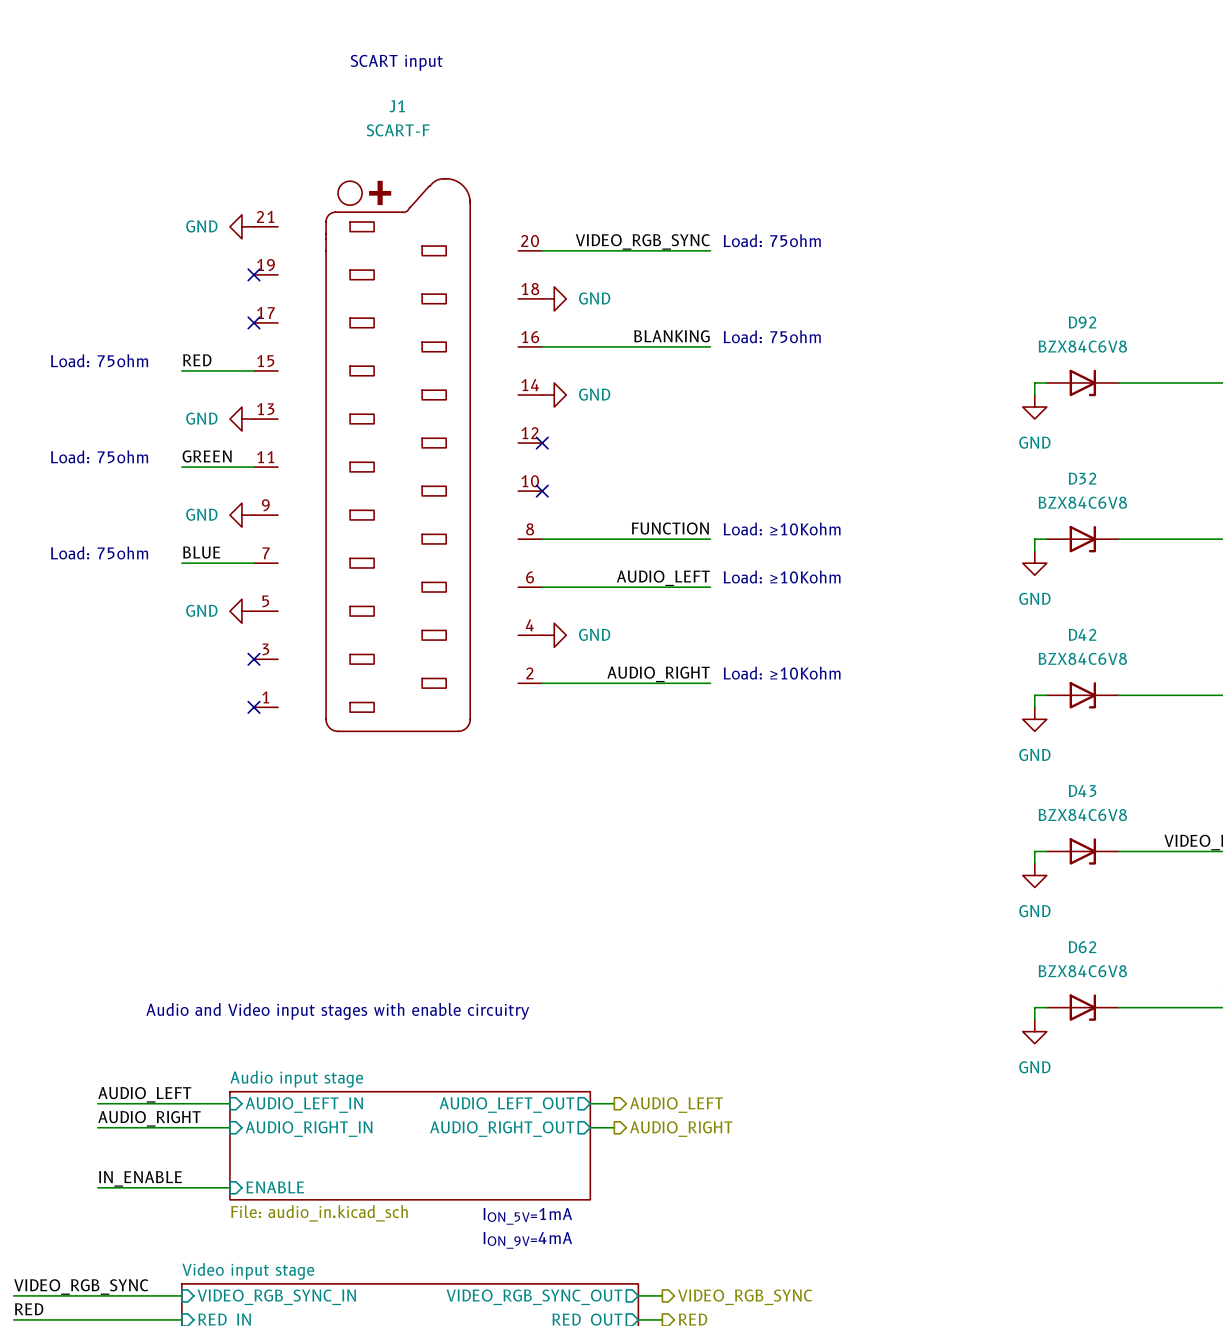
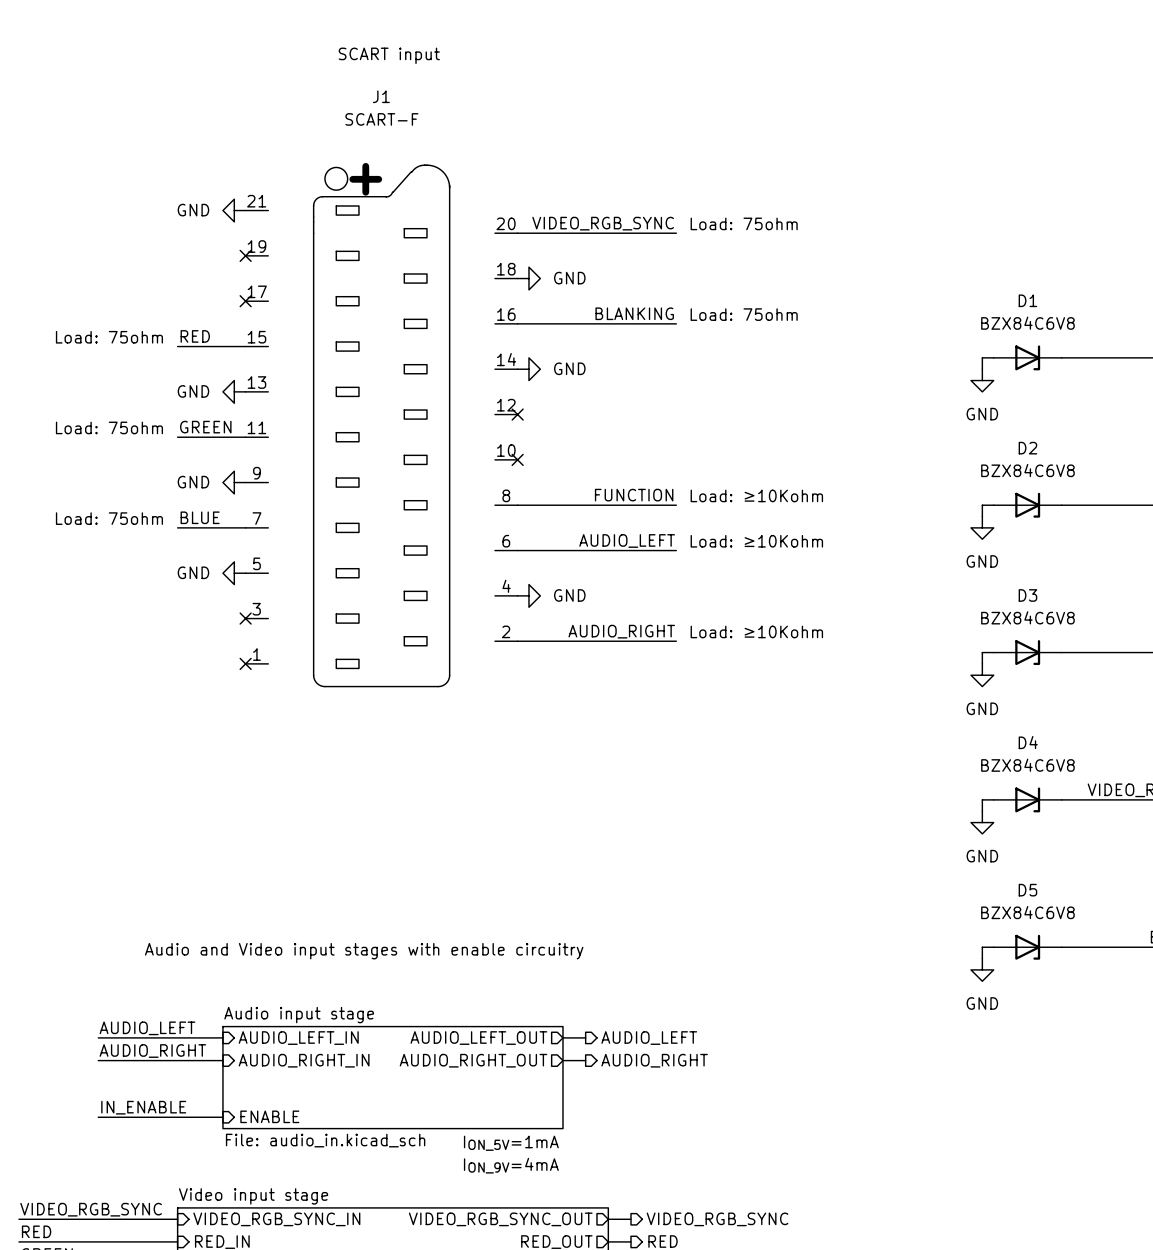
D92 name: D92 (1082, 322) -> D1 (1027, 300)
D32 name: D32 (1082, 478) -> D2 (1027, 448)
D42 name: D42 (1082, 634) -> D3 (1027, 595)
D43 name: D43 (1082, 790) -> D4 (1028, 742)
D62 name: D62 (1082, 947) -> D5 (1027, 890)

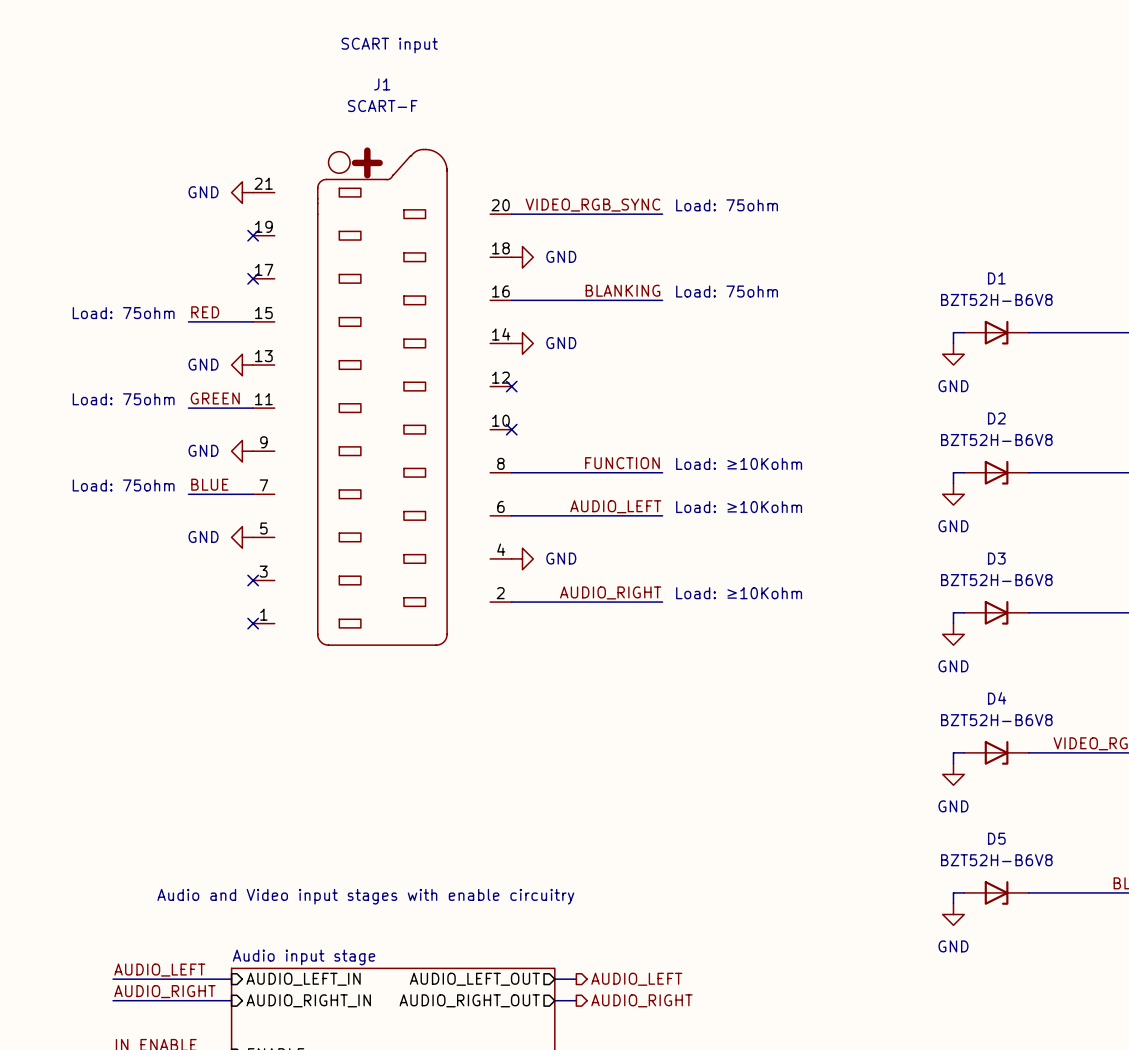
D1 value: BZX84C6V8 (1027, 323) -> BZT52H-B6V8 (996, 299)
D2 value: BZX84C6V8 (1027, 470) -> BZT52H-B6V8 (996, 440)
D3 value: BZX84C6V8 (1027, 617) -> BZT52H-B6V8 (996, 580)
D4 value: BZX84C6V8 (1027, 765) -> BZT52H-B6V8 (996, 720)
D5 value: BZX84C6V8 (1027, 912) -> BZT52H-B6V8 (996, 860)

